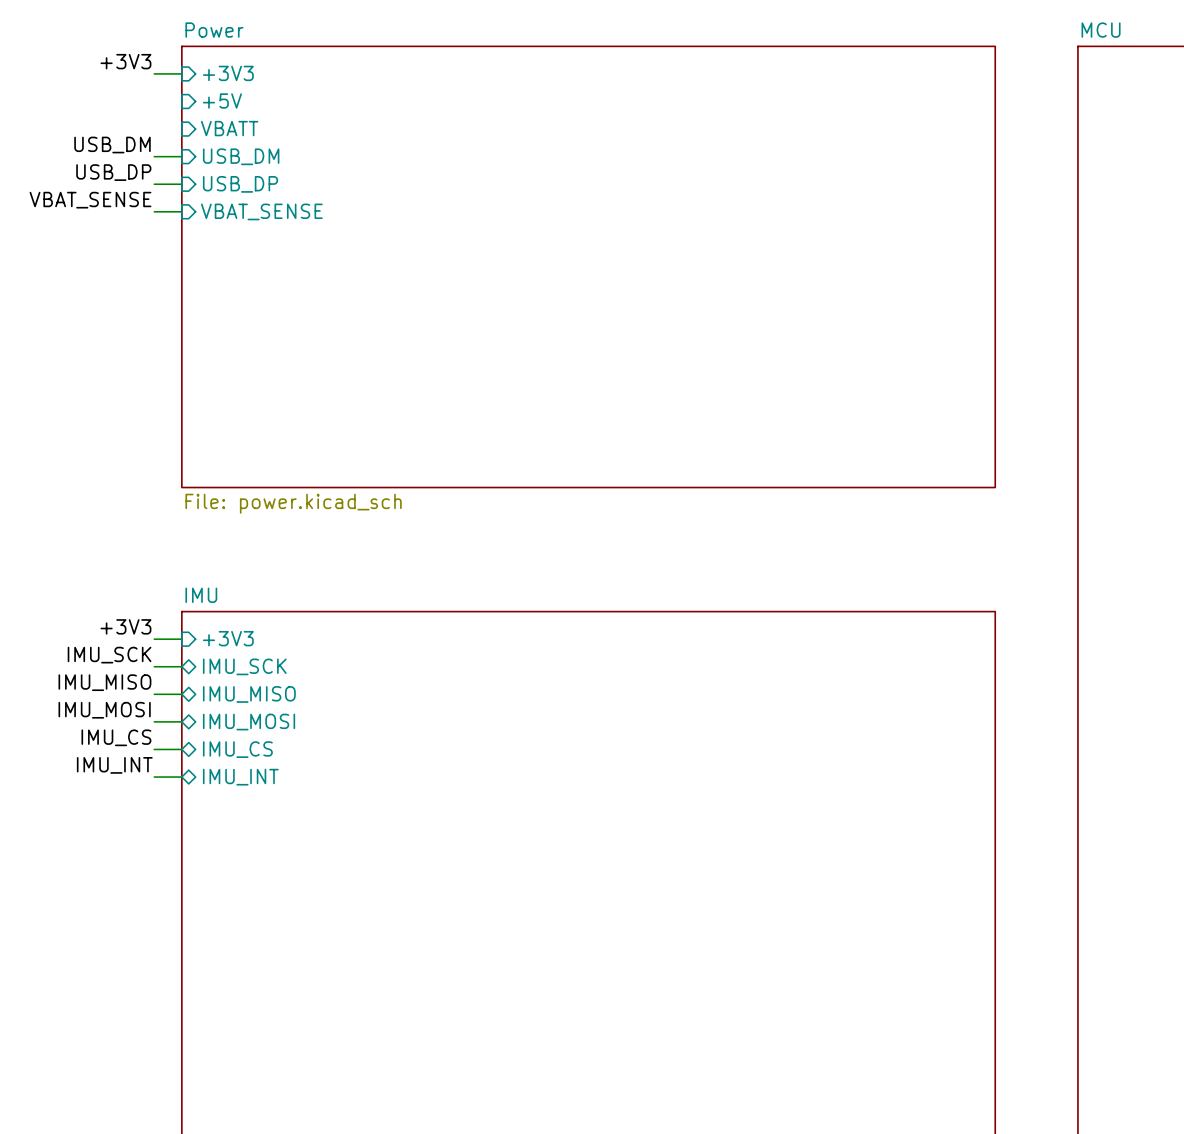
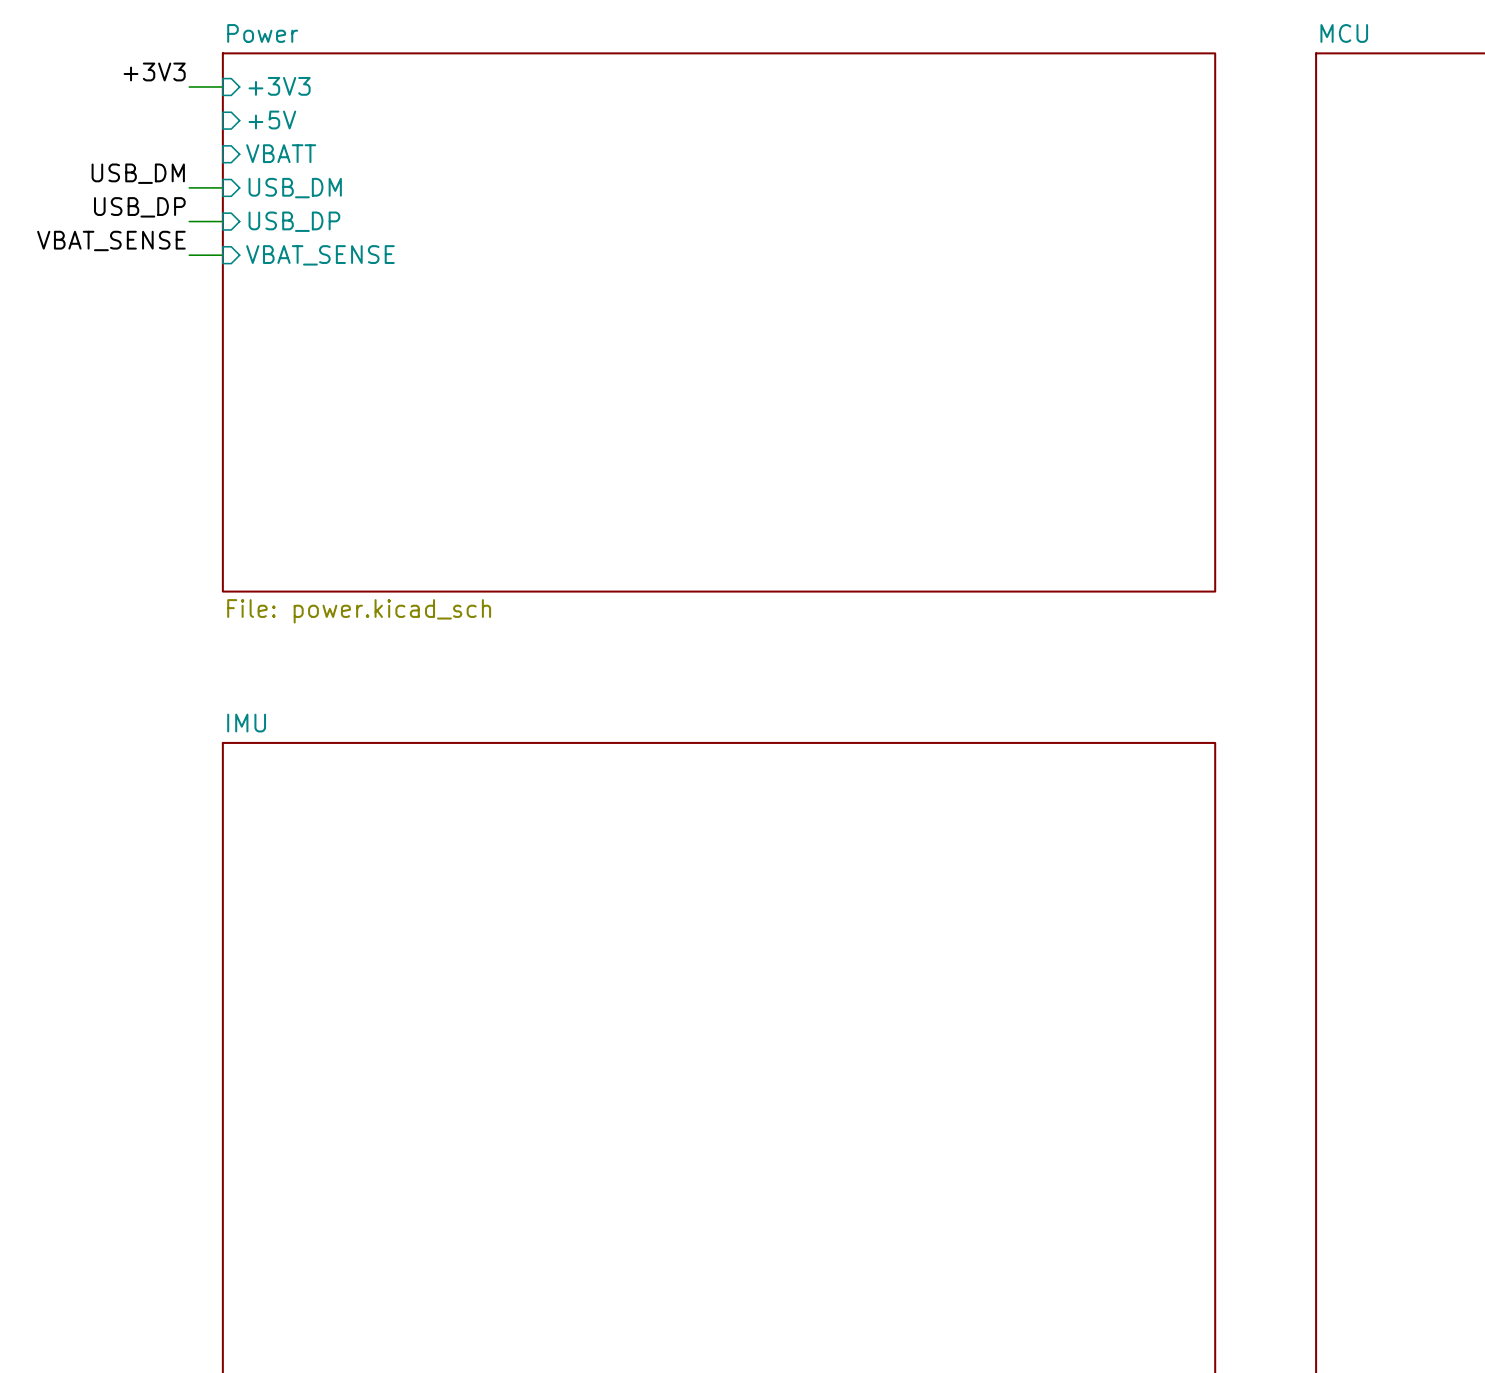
label: +3V3 (125, 626) -> none
sheet pin: +3V3 (228, 638) -> none
wire: (154, 639) (181, 639) -> none
label: IMU_SCK (109, 655) -> none
wire: (154, 666) (181, 666) -> none
sheet pin: IMU_SCK (244, 666) -> none
label: IMU_MISO (104, 682) -> none
wire: (154, 694) (181, 694) -> none
sheet pin: IMU_MISO (249, 694) -> none
label: IMU_MOSI (104, 710) -> none
wire: (154, 721) (181, 721) -> none
sheet pin: IMU_MOSI (249, 722) -> none
label: IMU_CS (116, 737) -> none
wire: (154, 749) (181, 749) -> none
sheet pin: IMU_CS (237, 749) -> none
label: IMU_INT (114, 765) -> none
wire: (154, 777) (181, 777) -> none
sheet pin: IMU_INT (240, 777) -> none

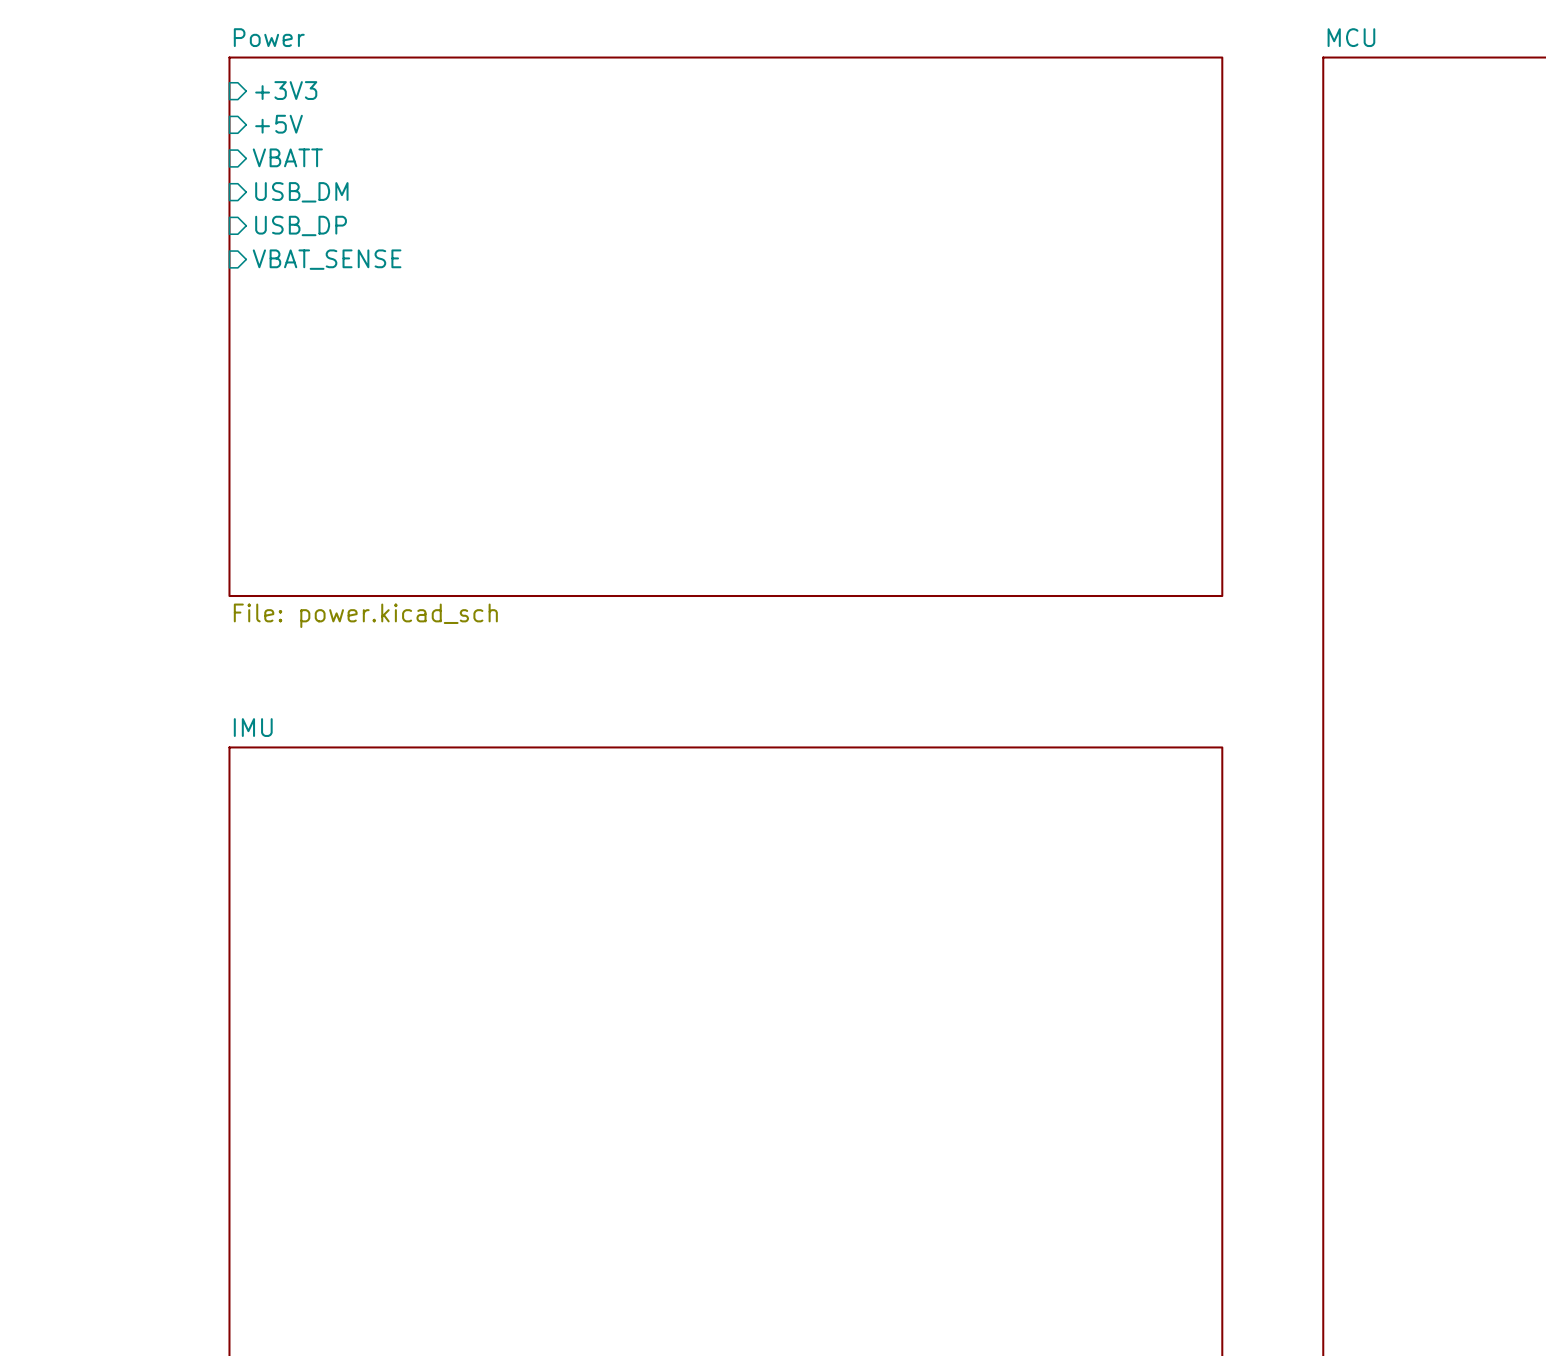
label: +3V3 (154, 71) -> none
wire: (189, 87) (222, 87) -> none
label: USB_DM (138, 173) -> none
wire: (189, 187) (222, 187) -> none
label: USB_DP (139, 207) -> none
wire: (189, 221) (222, 221) -> none
label: VBAT_SENSE (111, 240) -> none
wire: (189, 255) (222, 255) -> none

